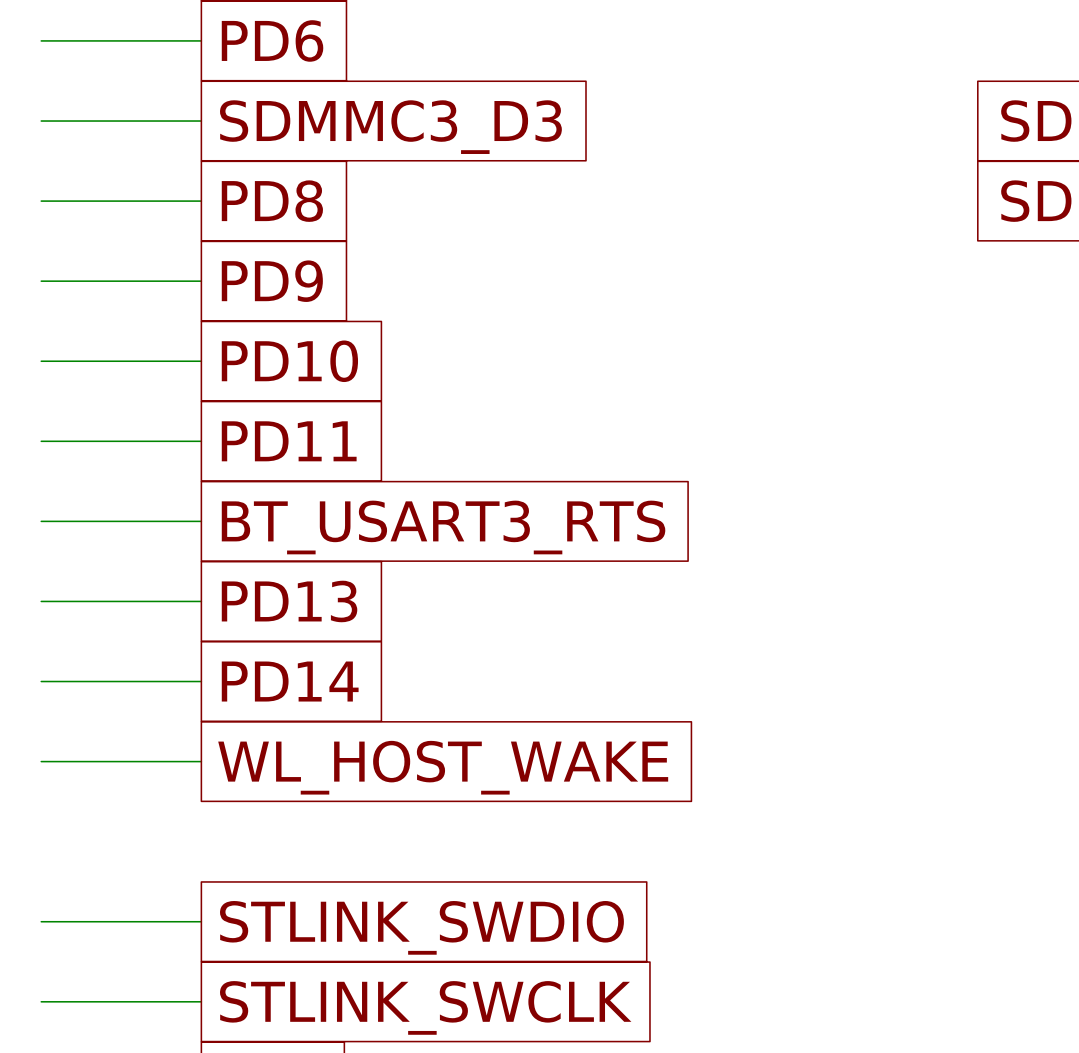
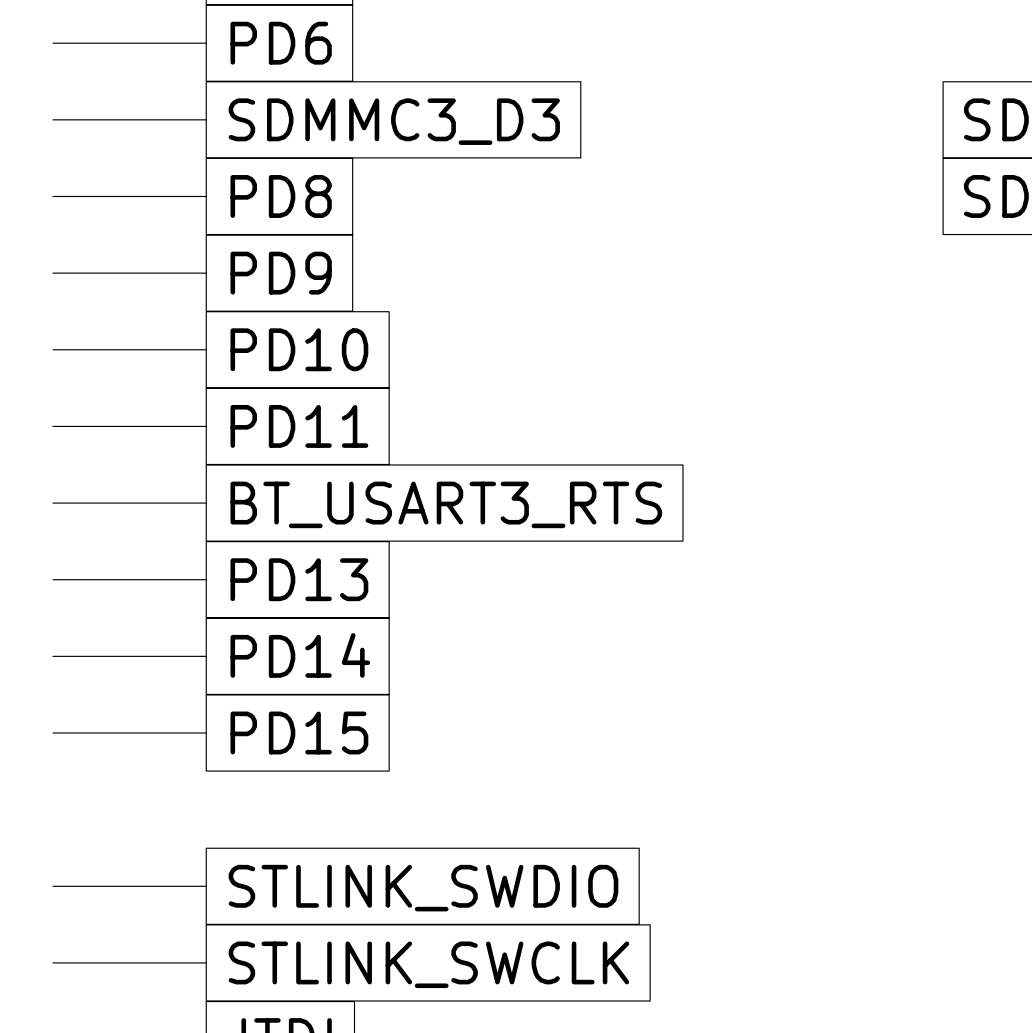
global label: WL_HOST_WAKE (443, 767) -> PD15 (299, 733)

